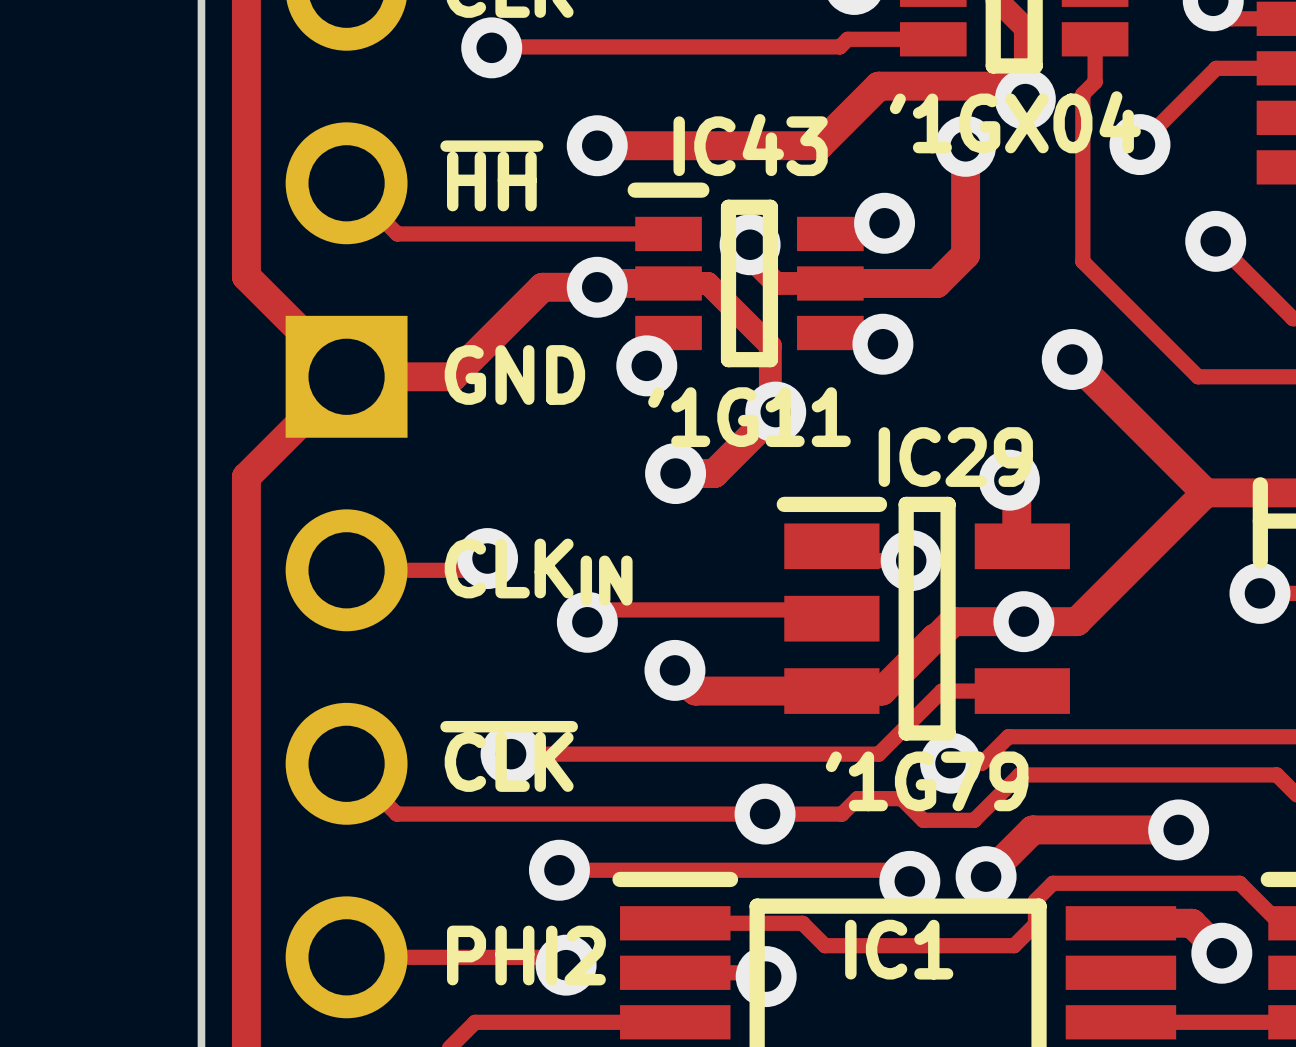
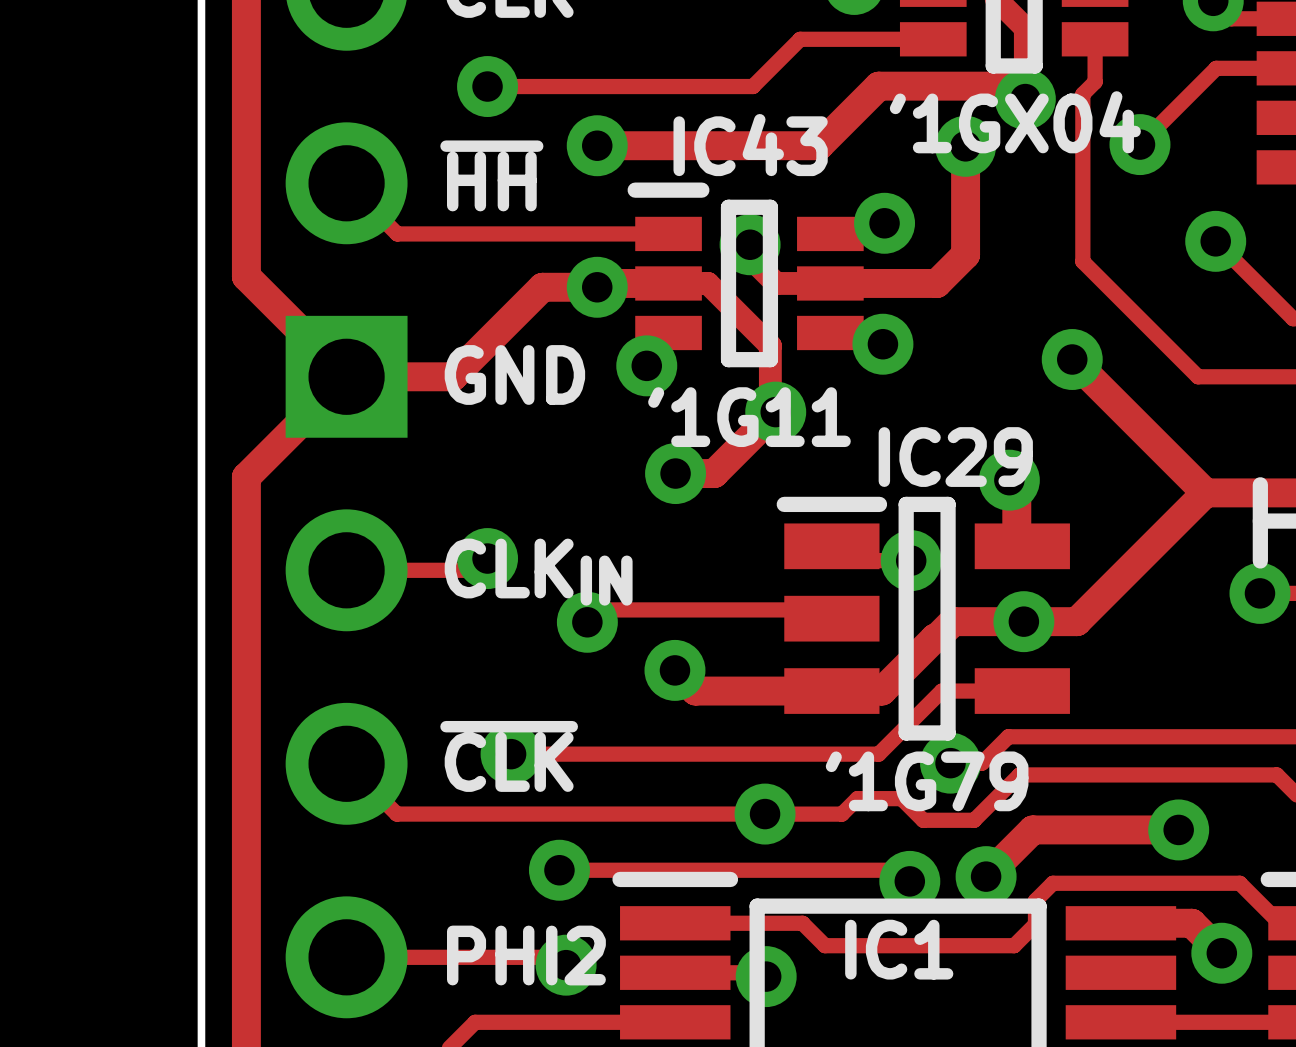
track: (847, 39) (840, 46) (492, 46) -> (847, 39) (800, 39) (752, 86) (487, 86)
via position: (491, 47) -> (487, 86)

